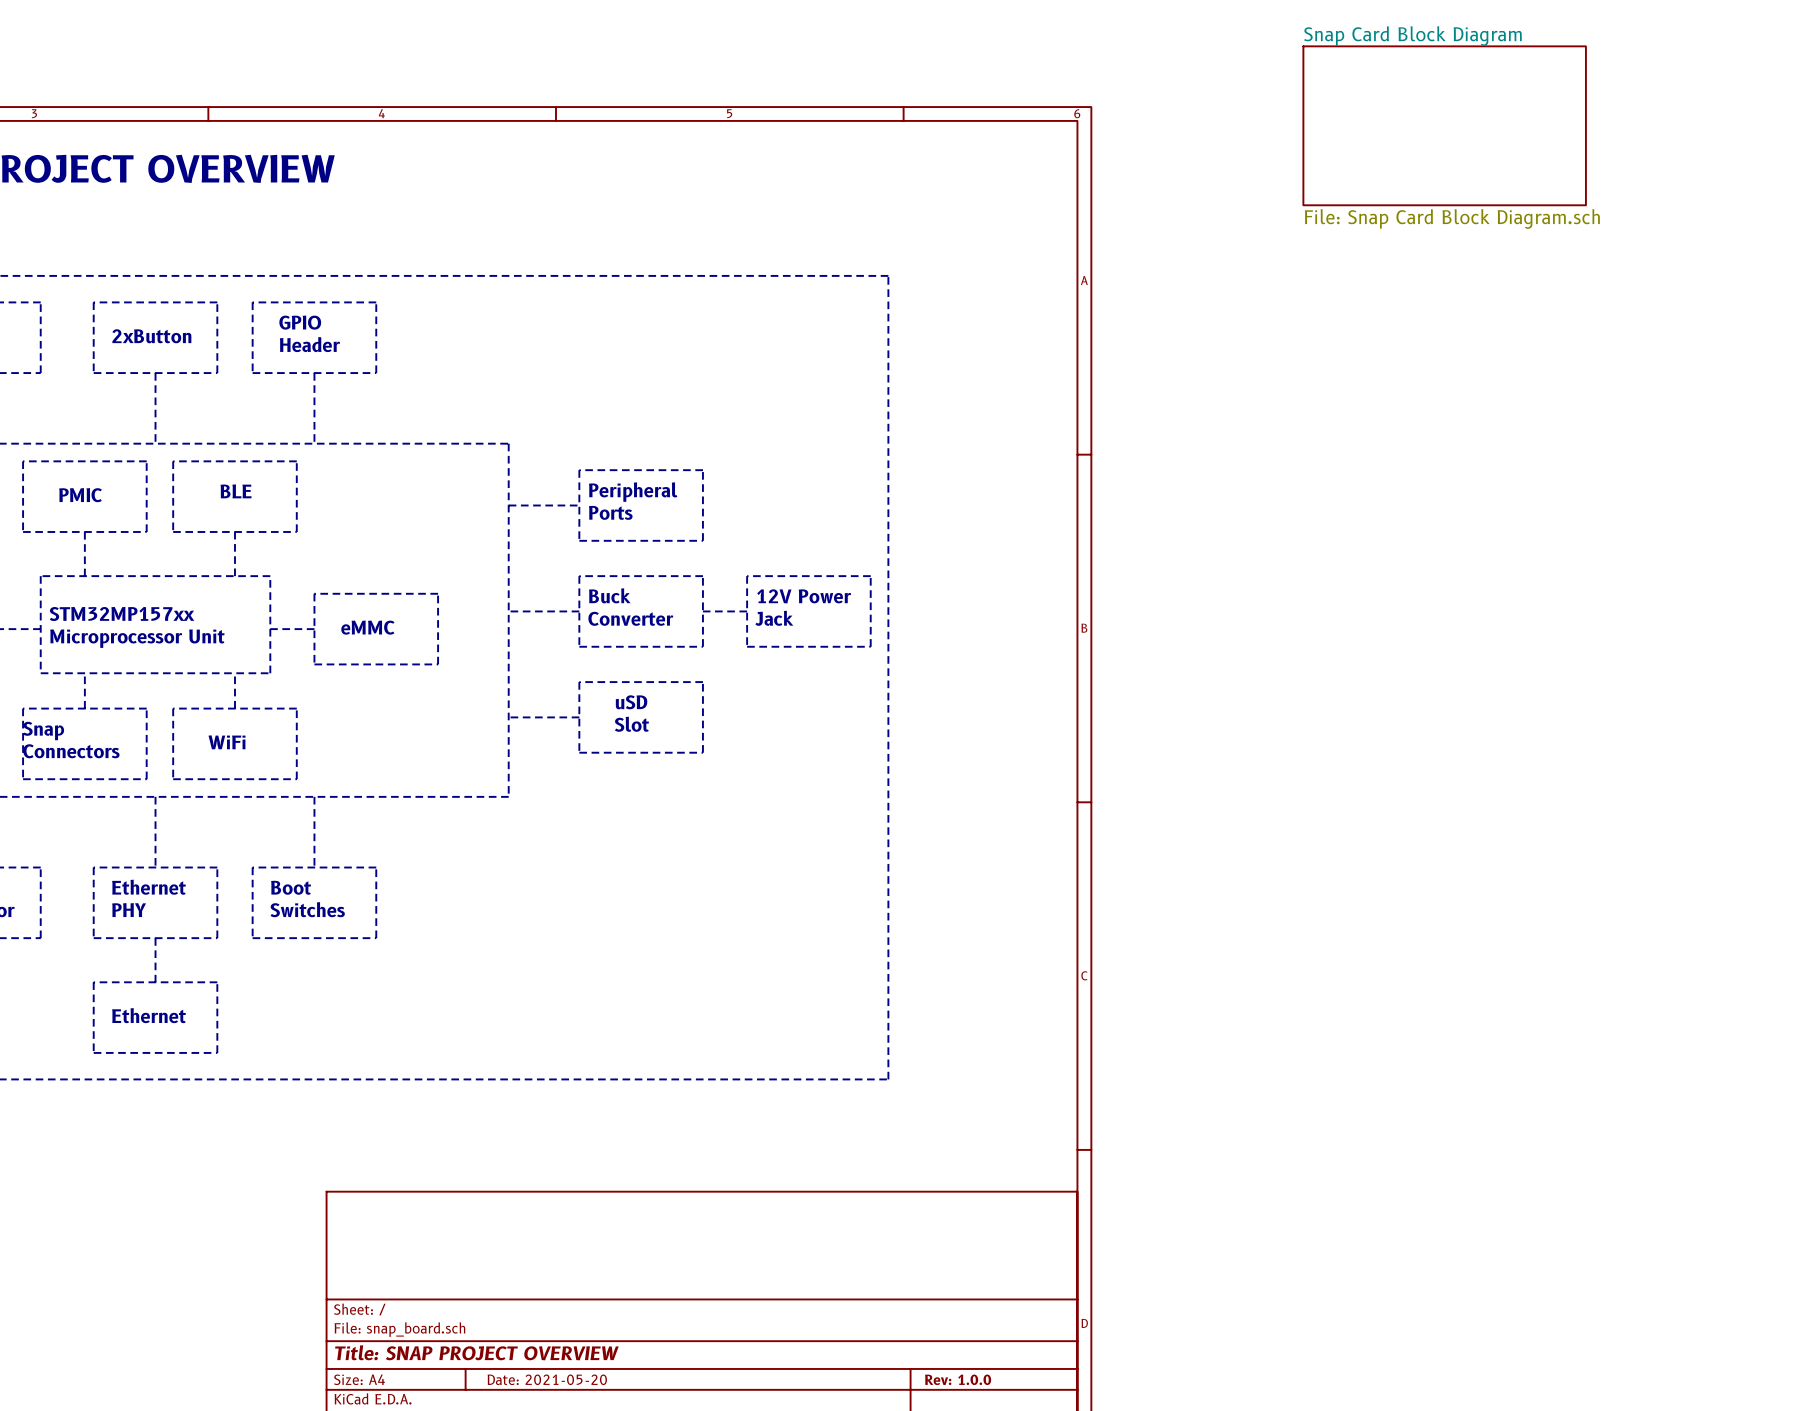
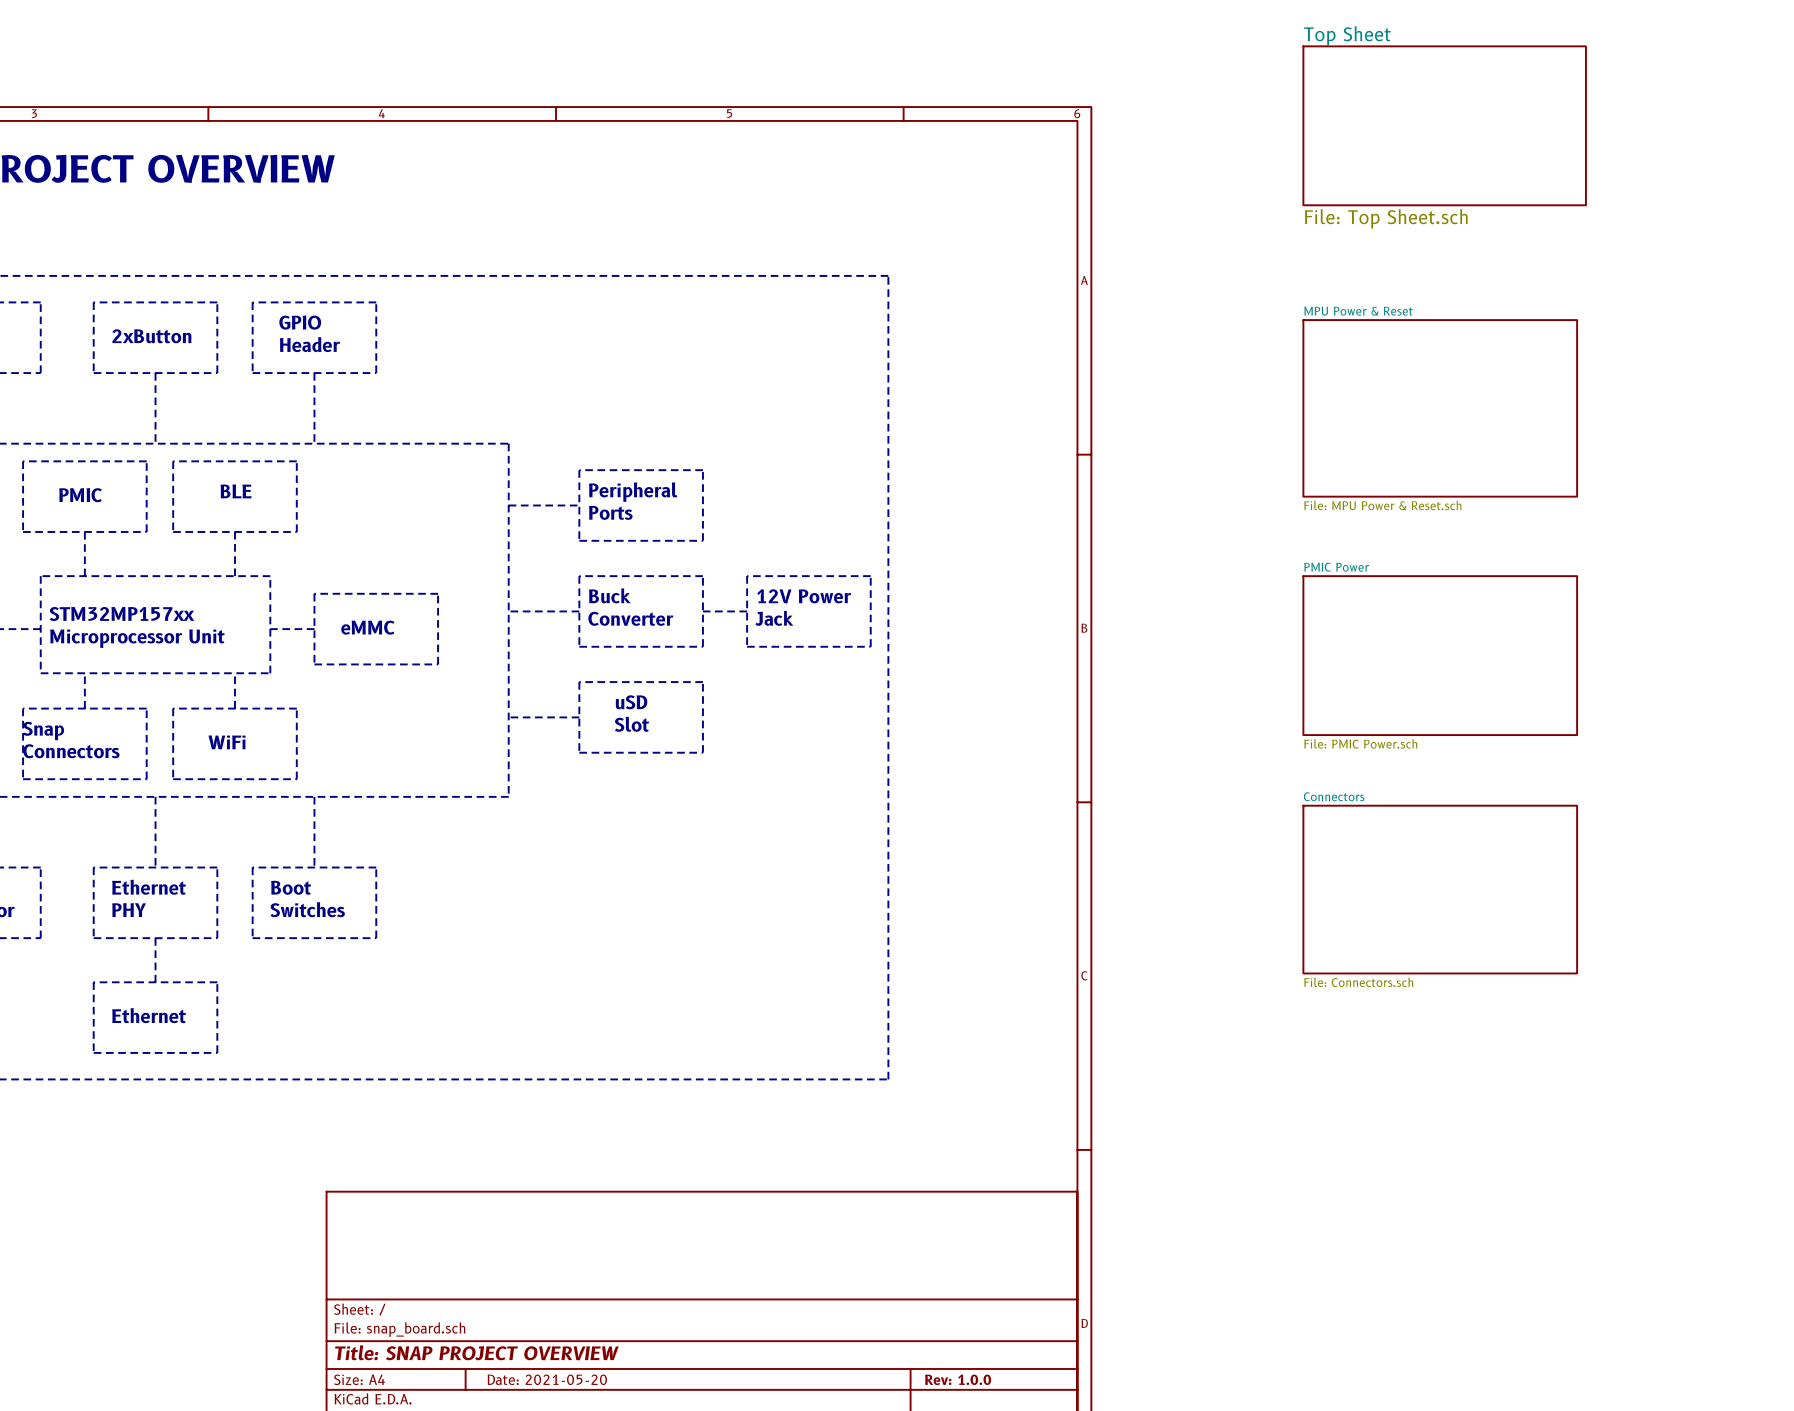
sheet Snap Card Block Diagram name: Snap Card Block Diagram (1412, 36) -> Top Sheet (1347, 36)
sheet Snap Card Block Diagram value: File: Snap Card Block Diagram.sch (1452, 219) -> File: Top Sheet.sch (1386, 218)
sheet MPU Power & Reset: none -> File: MPU Power & Reset.sch (1440, 408)
sheet PMIC Power: none -> File: PMIC Power.sch (1440, 655)
sheet Connectors: none -> File: Connectors.sch (1440, 889)

